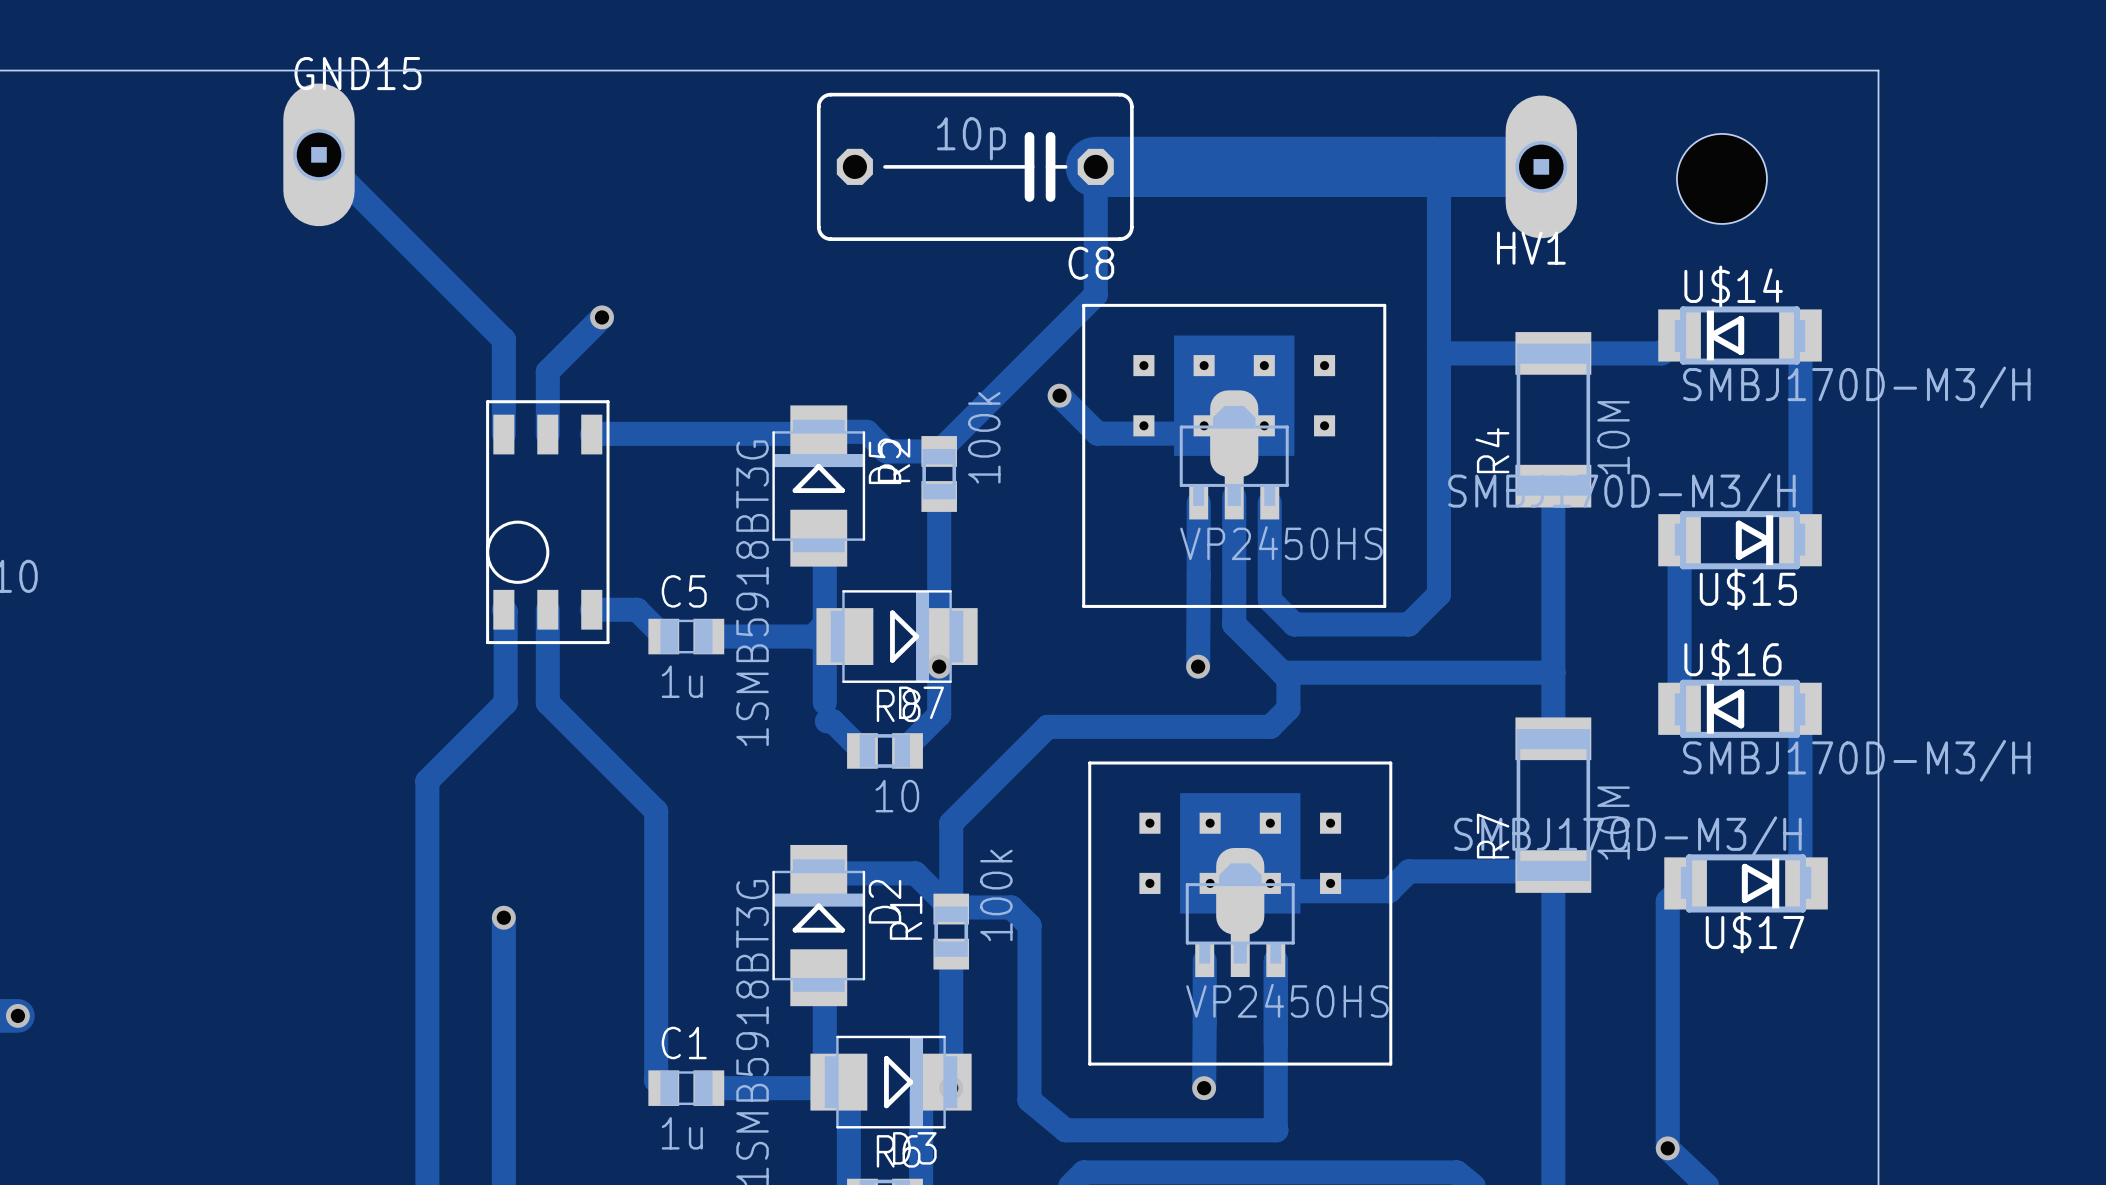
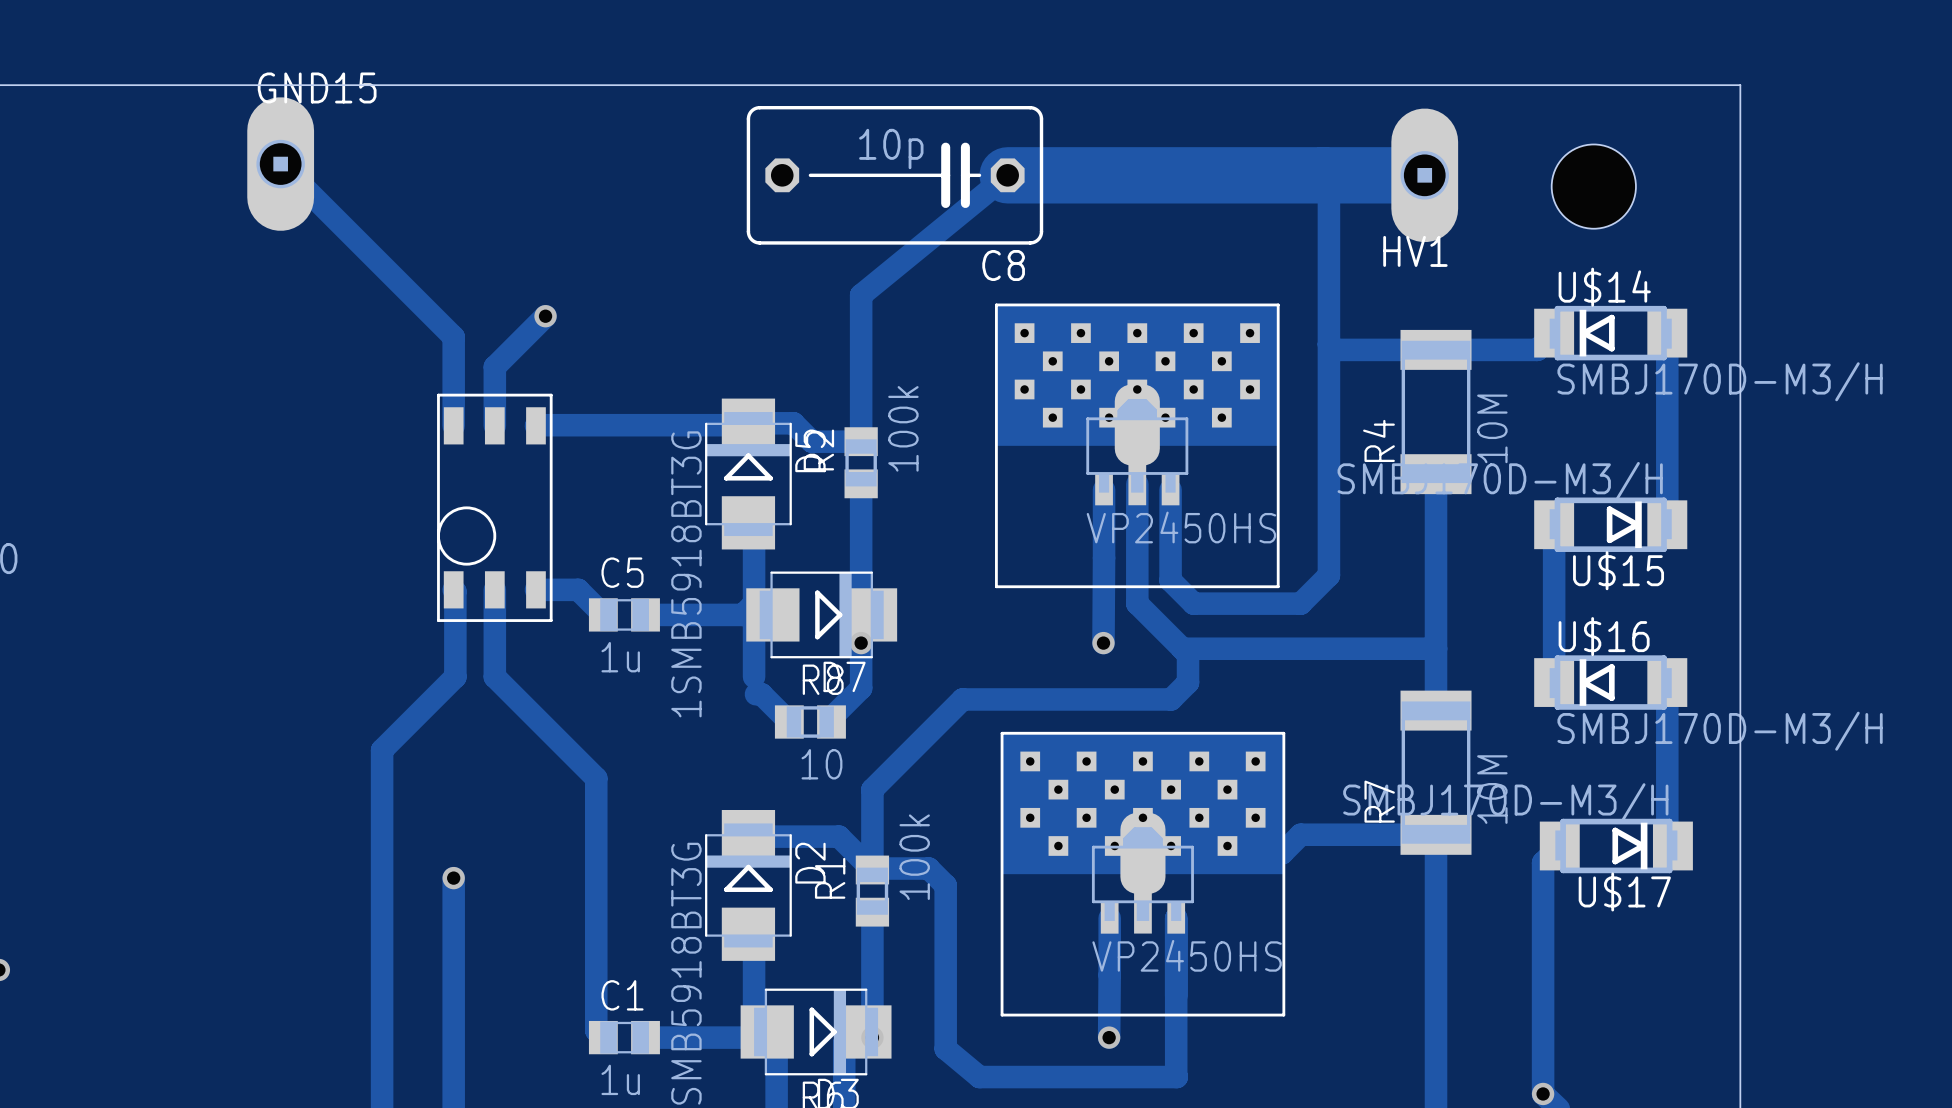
track: (1095, 166) (1095, 294) (939, 451) -> (1007, 175) (861, 295) (861, 441)
part footprint: [1082, 303, 1387, 608] -> [995, 303, 1280, 589]
track: (1059, 395) (1097, 433) (1234, 433) -> none
via: (1059, 395) -> none
part footprint: [1088, 761, 1393, 1066] -> [1000, 731, 1286, 1017]

